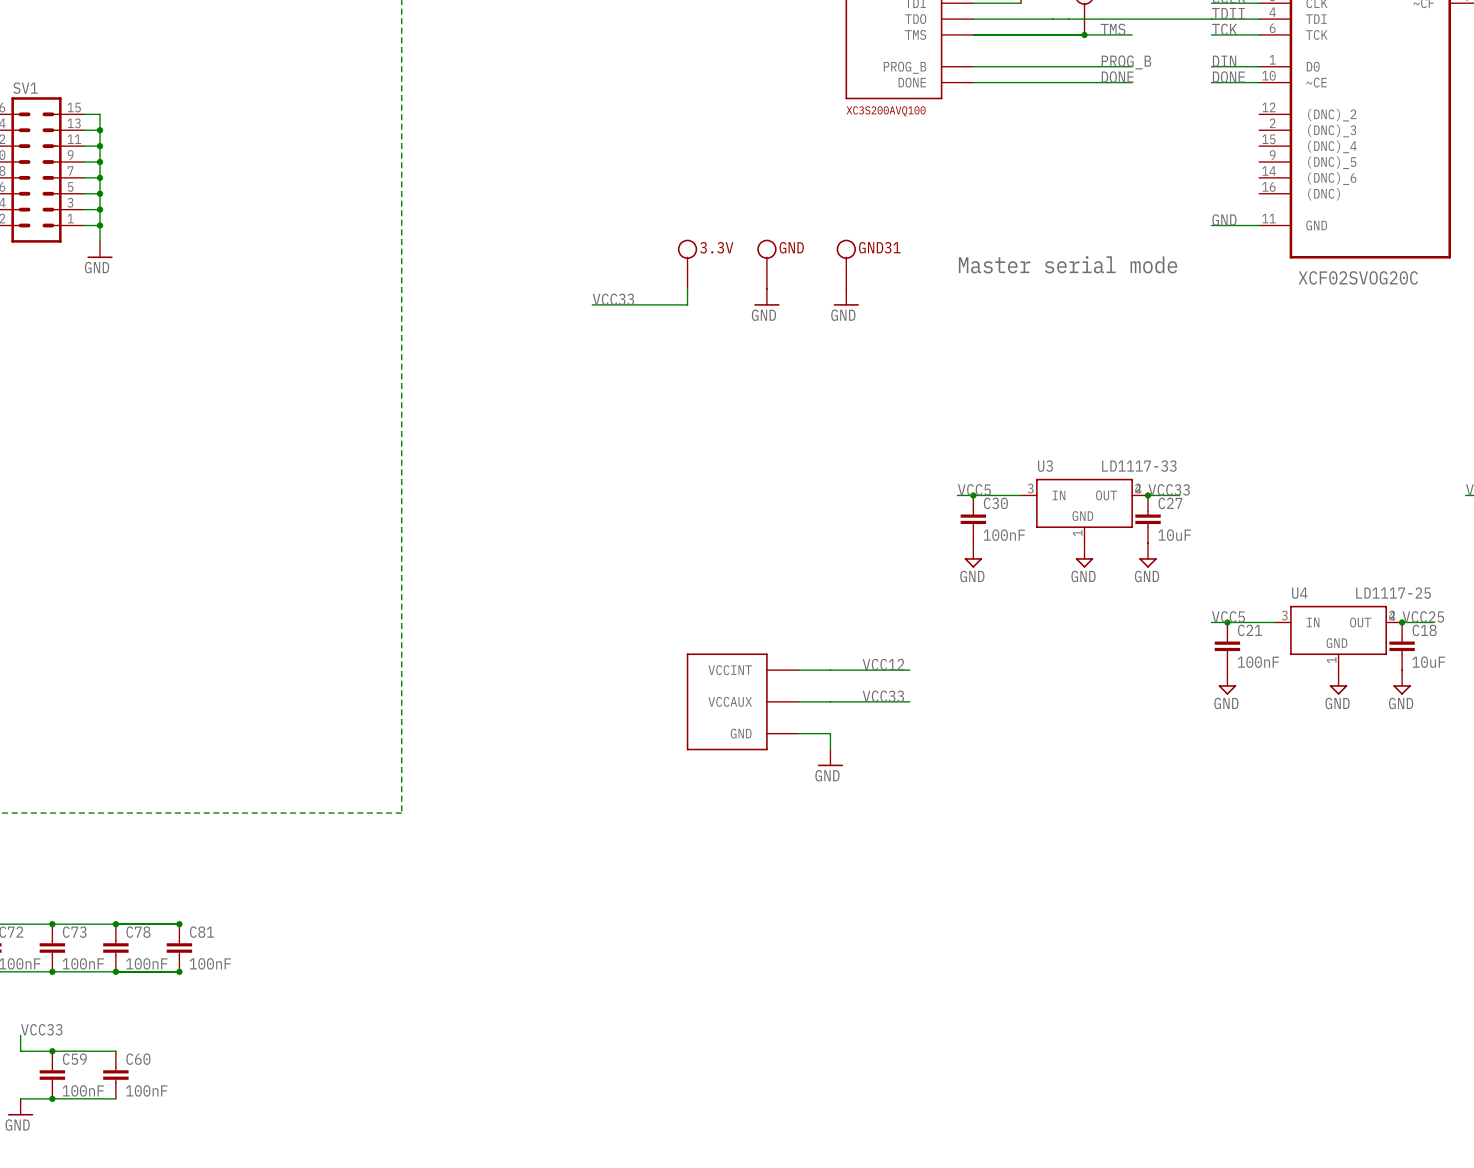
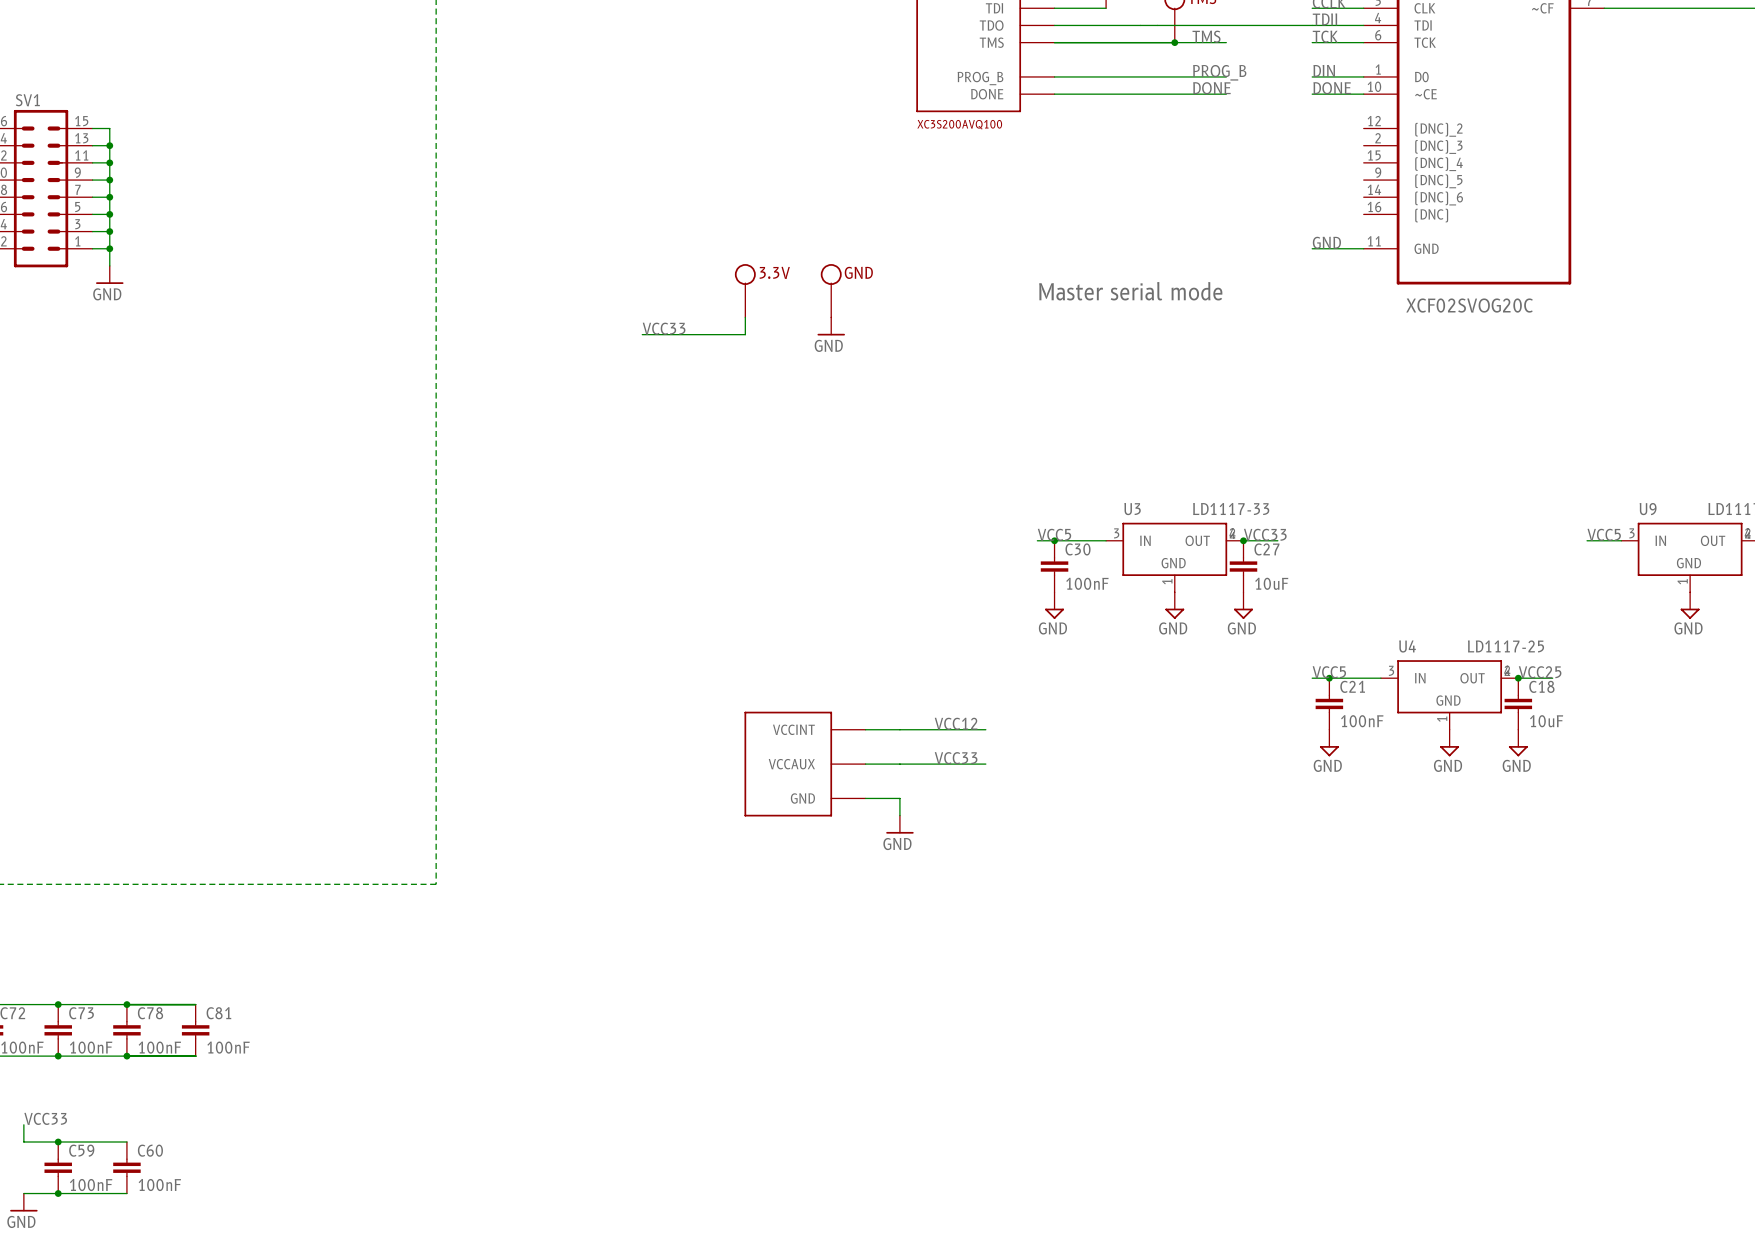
GND31: (846, 264) -> none
power symbol: GND (846, 297) -> none
junction: (179, 924) -> none
junction: (179, 971) -> none

